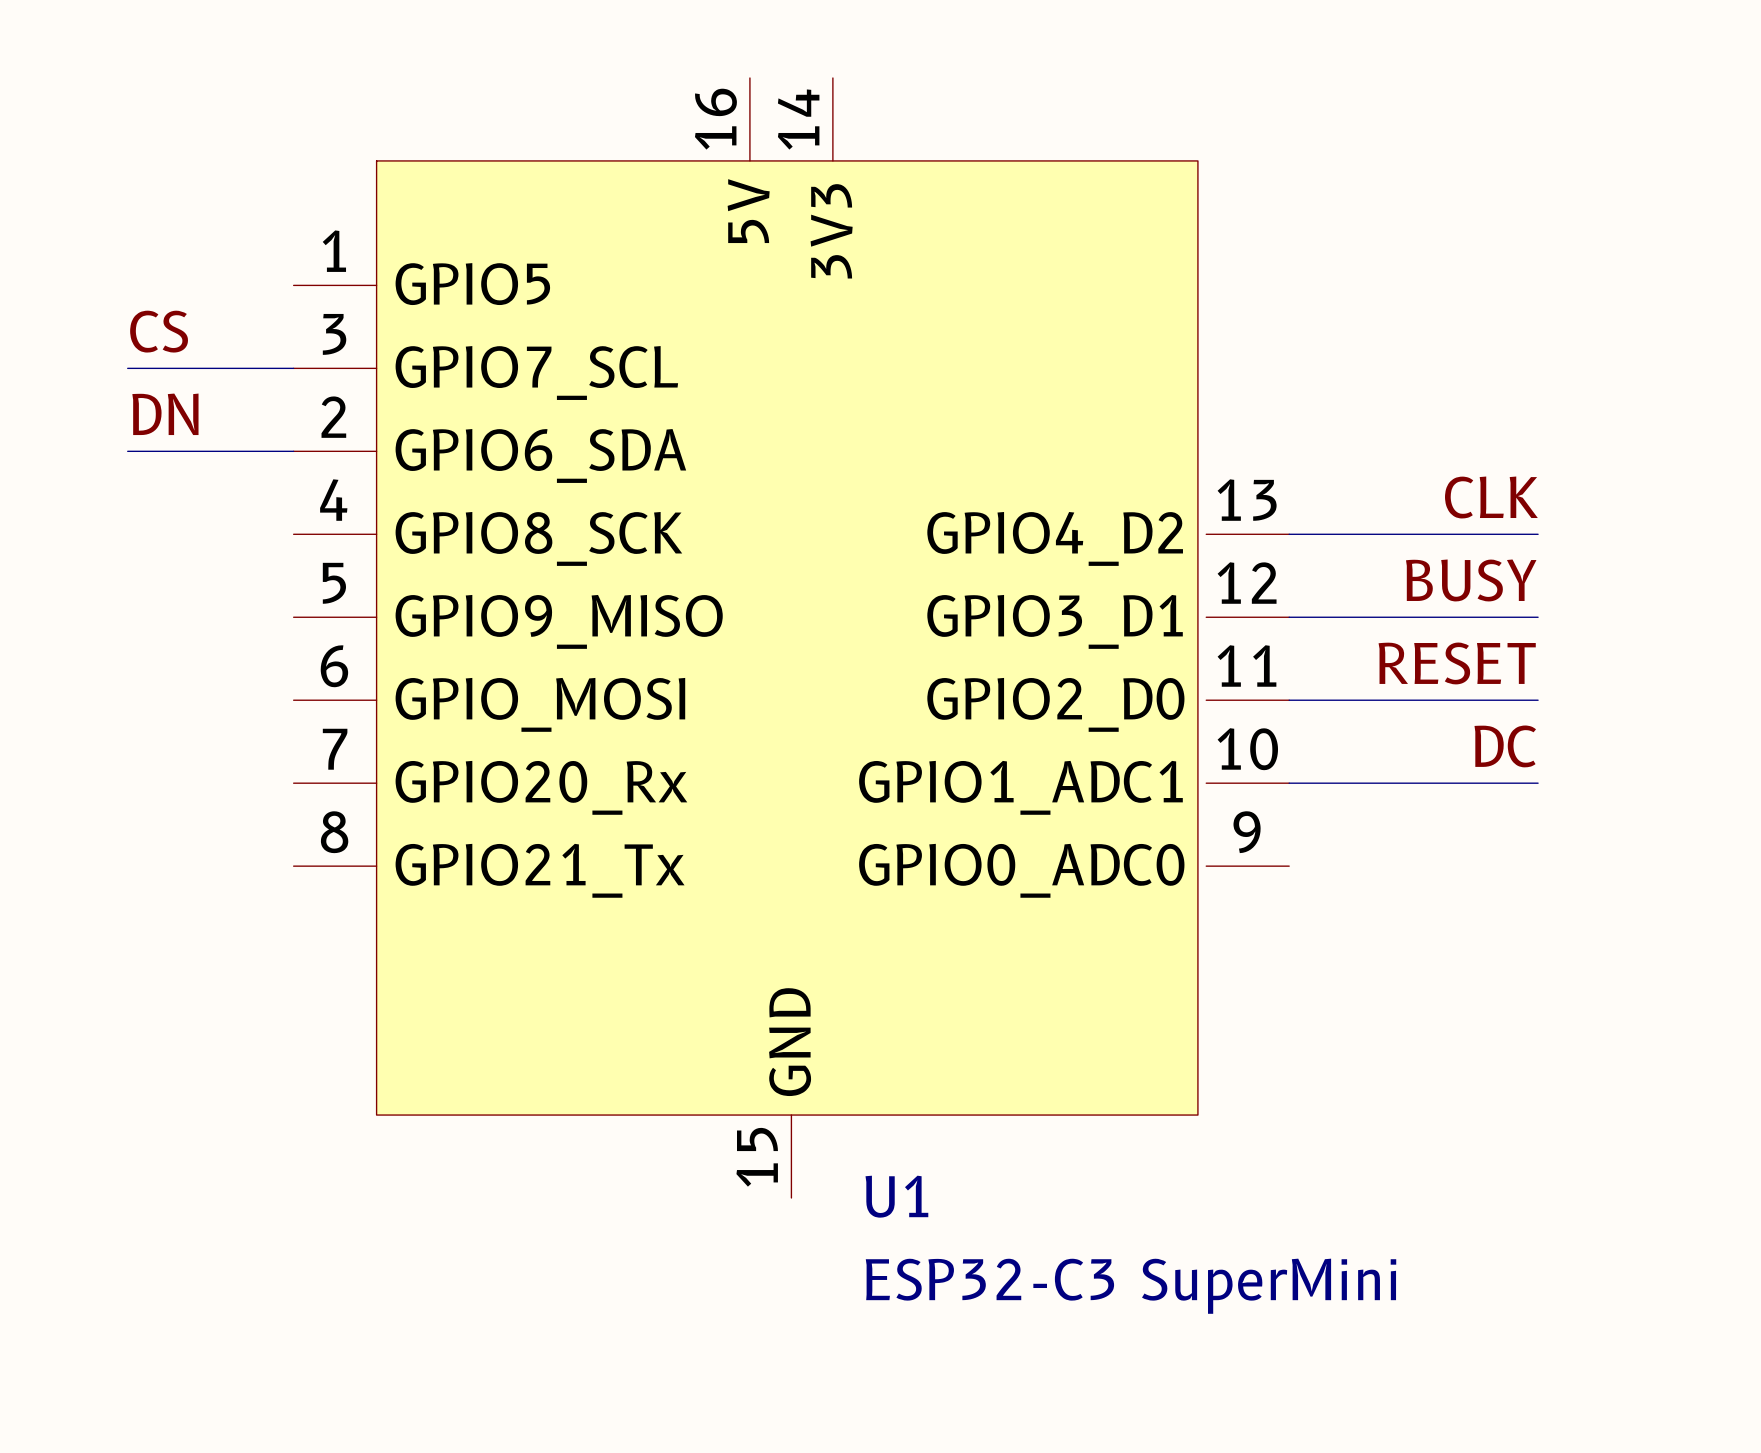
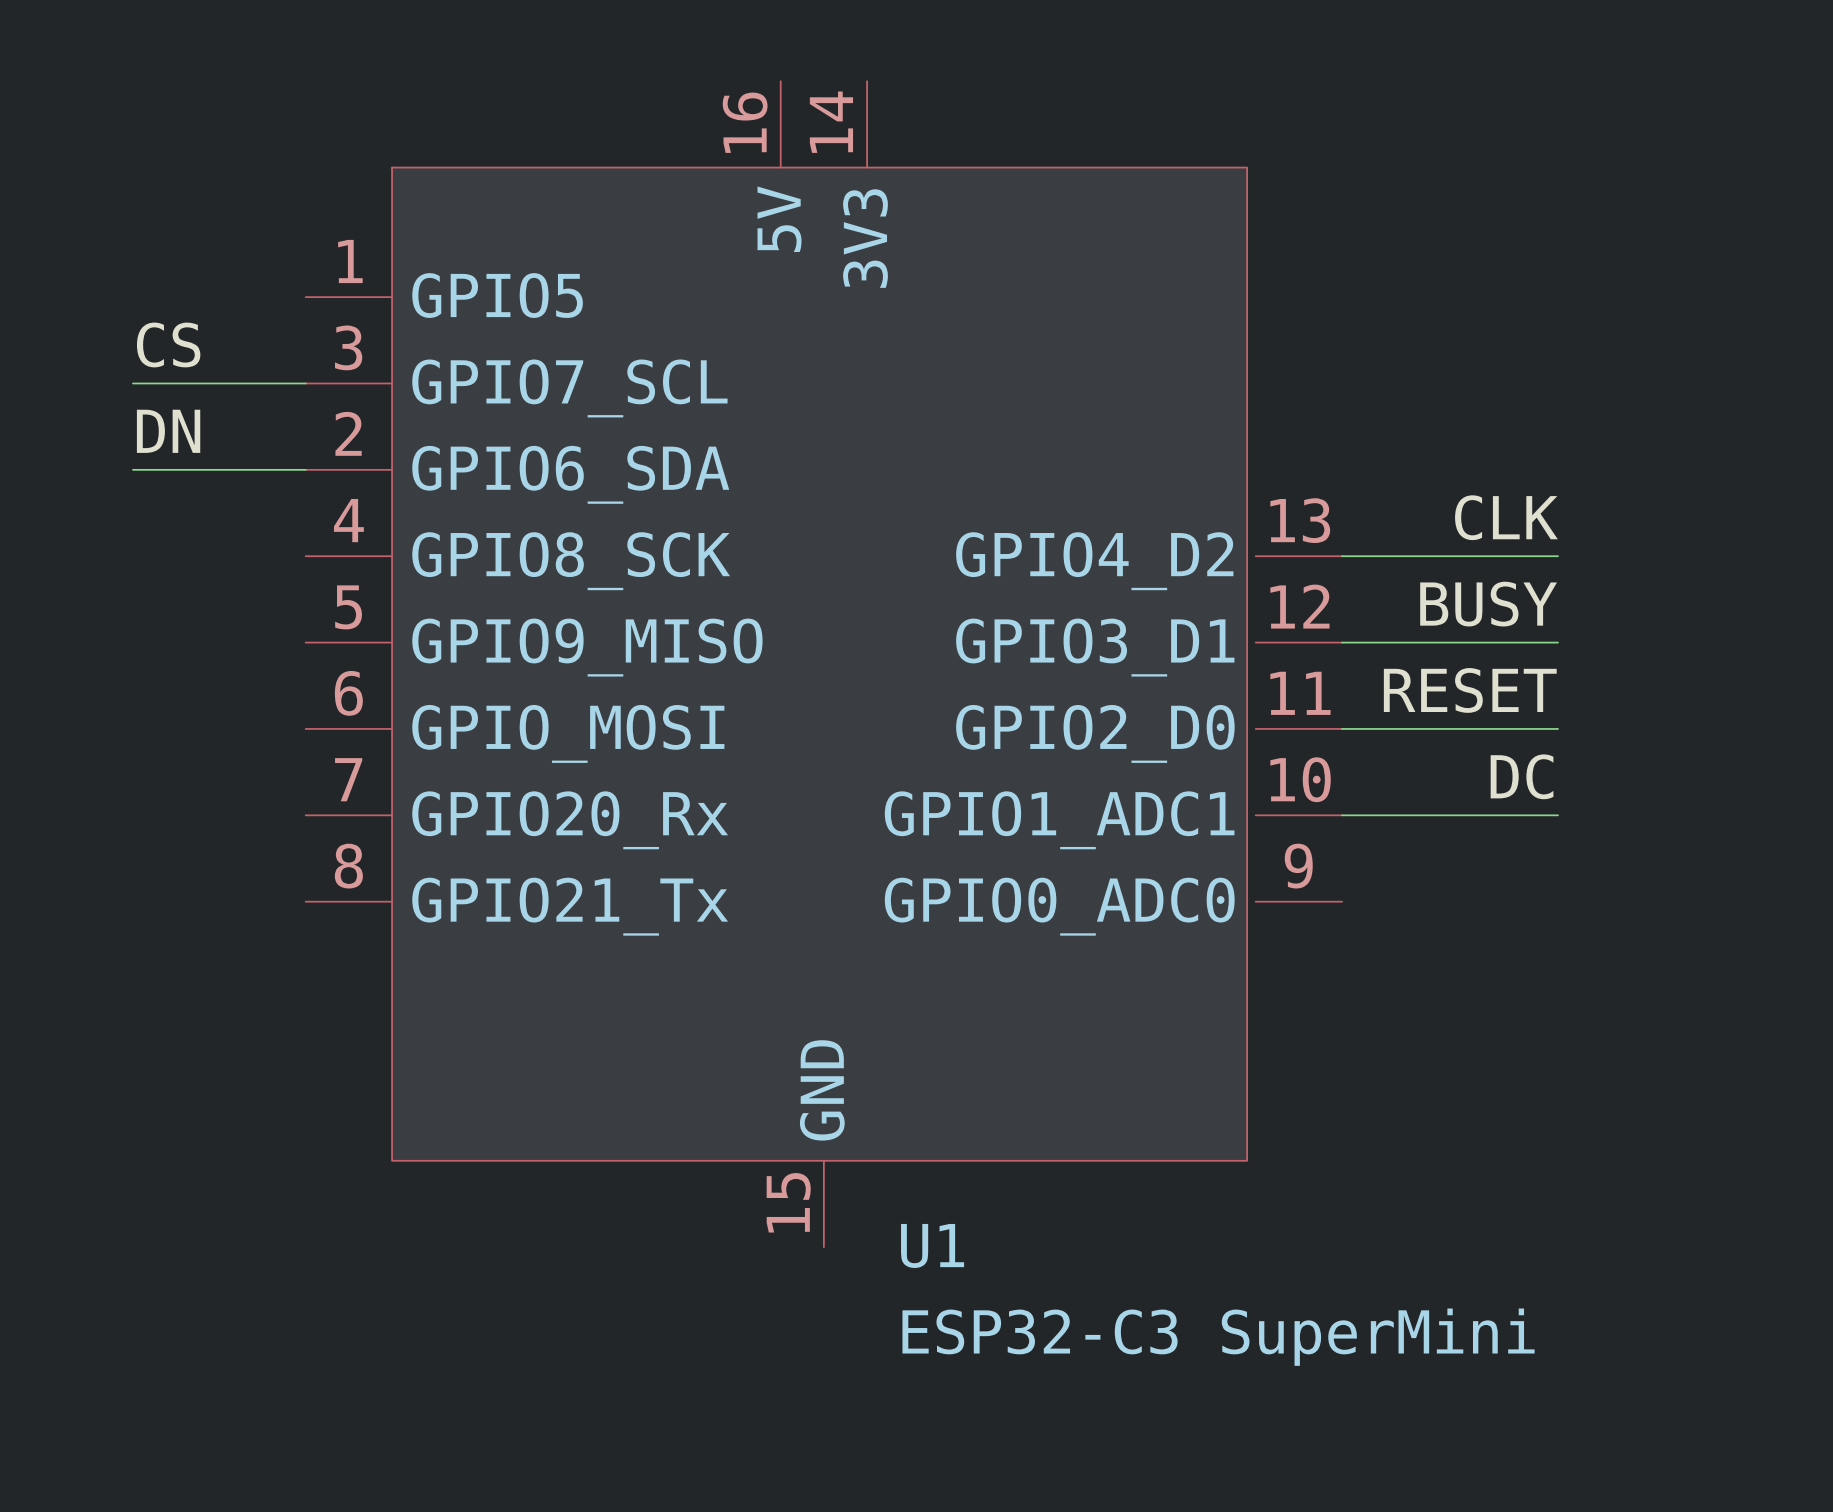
label position: CLK (1491, 497) -> CLK (1506, 517)
wire: (1496, 534) (1538, 534) -> none
label position: BUSY (1471, 580) -> BUSY (1488, 604)
wire: (1496, 617) (1538, 617) -> none
label position: RESET (1457, 663) -> RESET (1470, 690)
wire: (1496, 700) (1538, 700) -> none
label position: DC (1505, 746) -> DC (1522, 776)
wire: (1496, 783) (1538, 783) -> none

